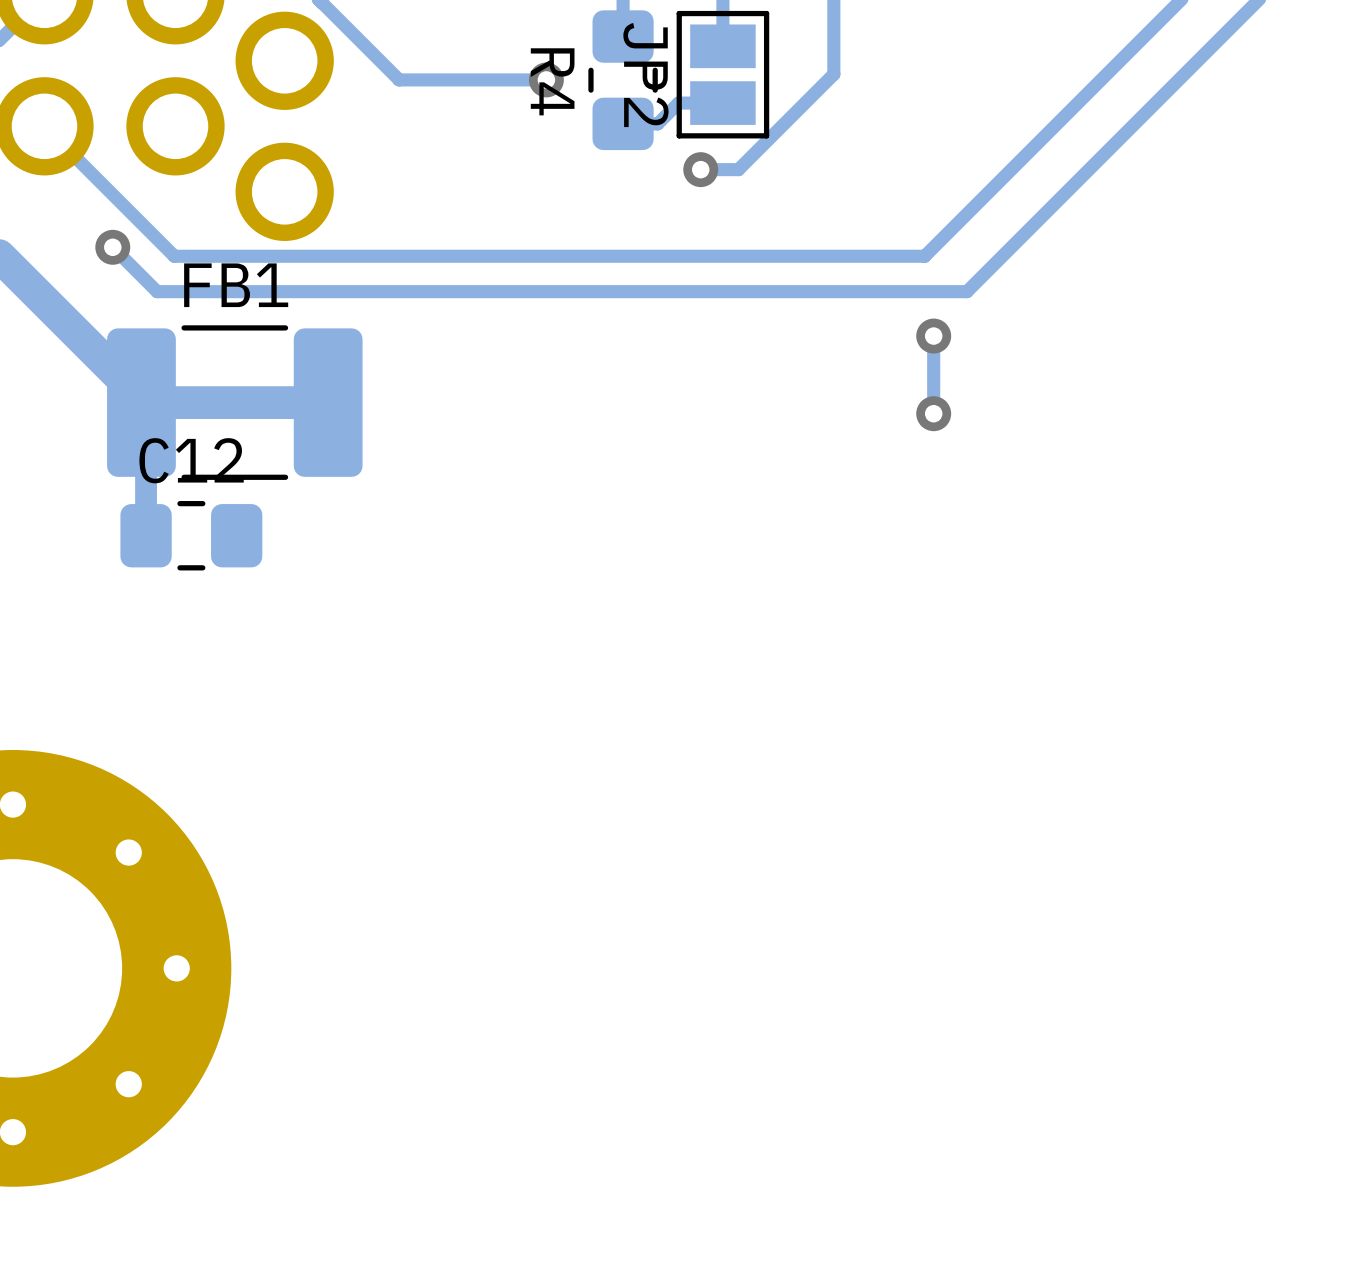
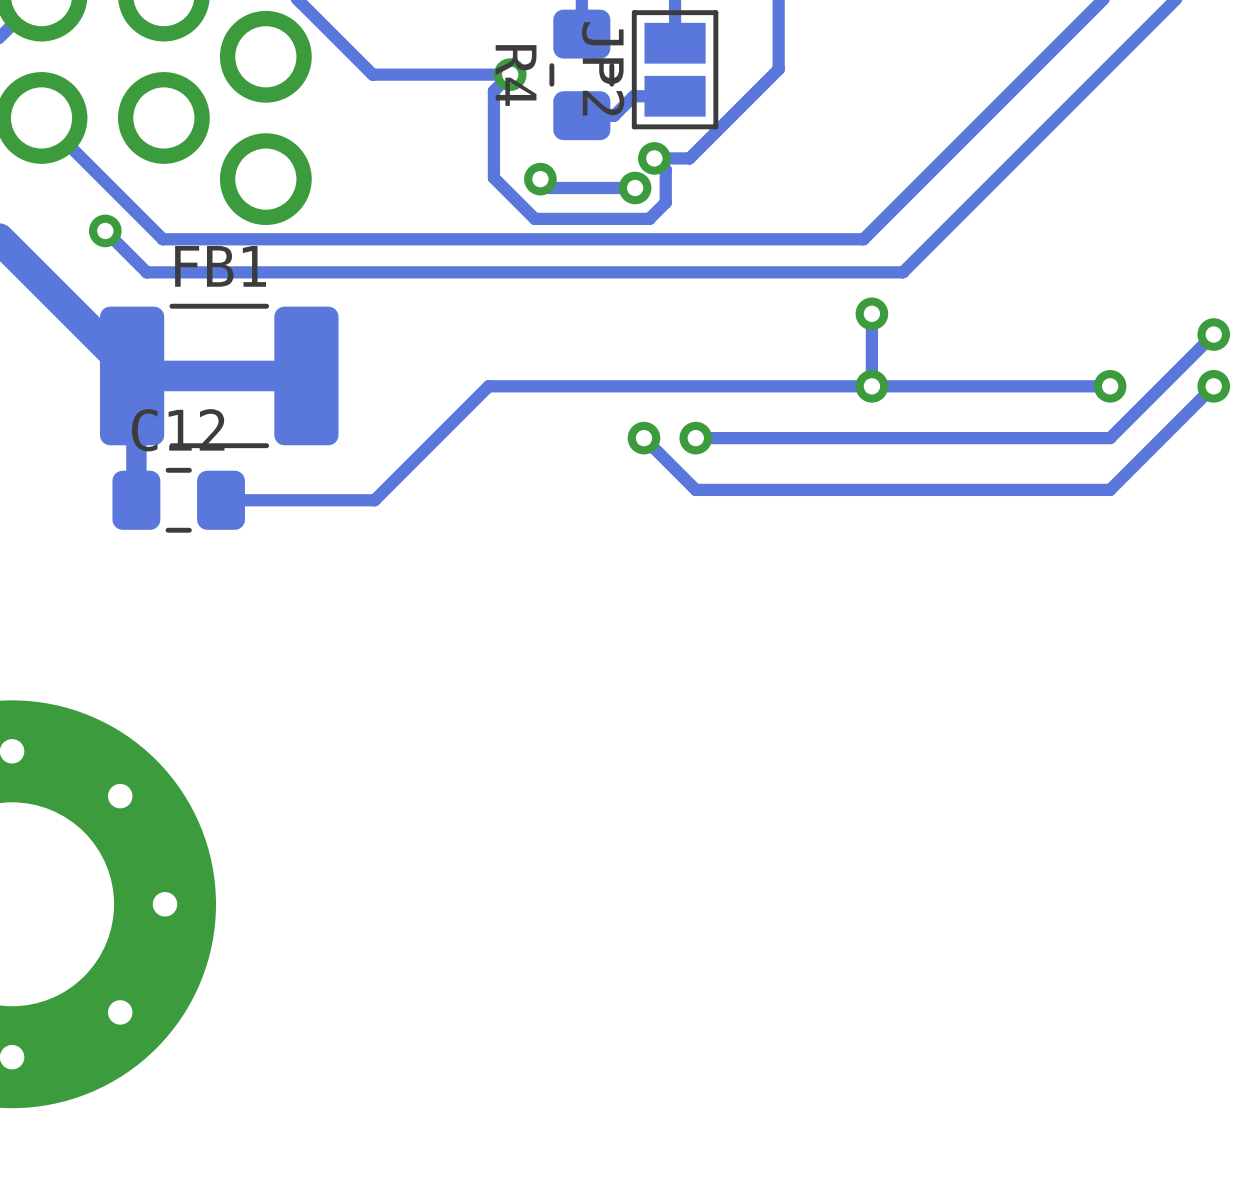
track: none -> (510, 74) (493, 90) (493, 177) (534, 218) (649, 218) (665, 202) (665, 169) (654, 158)
track: none -> (540, 179) (549, 187) (635, 187)
via: none -> (540, 179)
via: none -> (635, 187)
track: none -> (1213, 334) (1110, 438) (695, 438)
via: none -> (1213, 334)
track: none -> (1110, 386) (488, 386) (374, 500) (221, 500)
via: none -> (1110, 386)
track: none -> (1213, 386) (1110, 489) (695, 489) (643, 438)
via: none -> (1213, 386)
via: none -> (643, 438)
via: none -> (695, 438)

